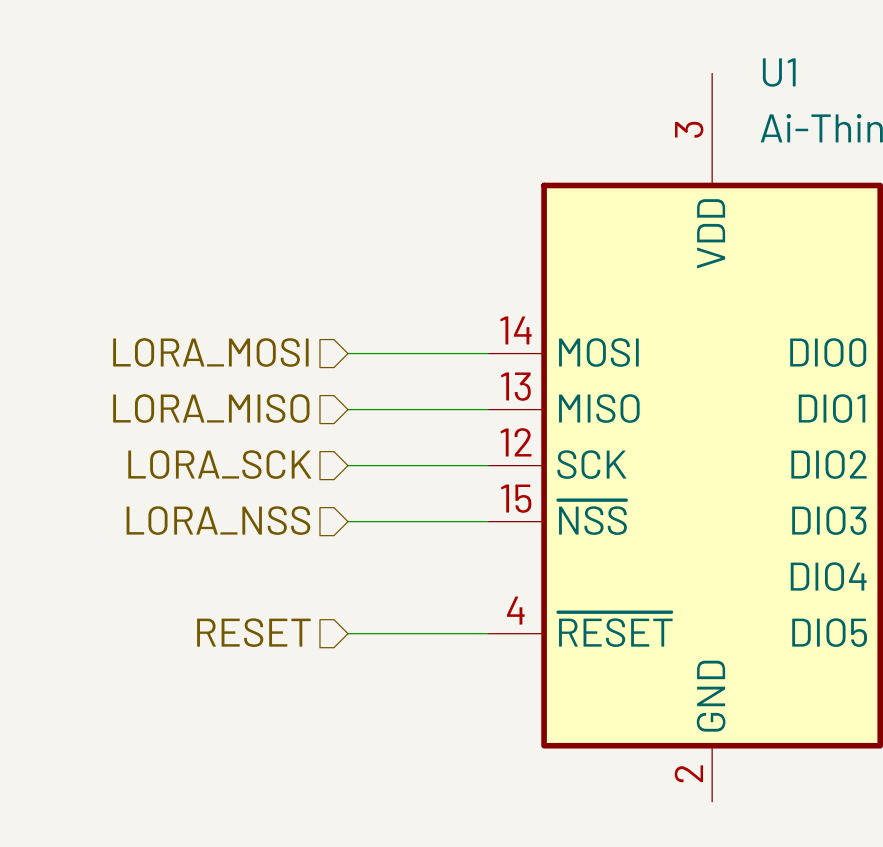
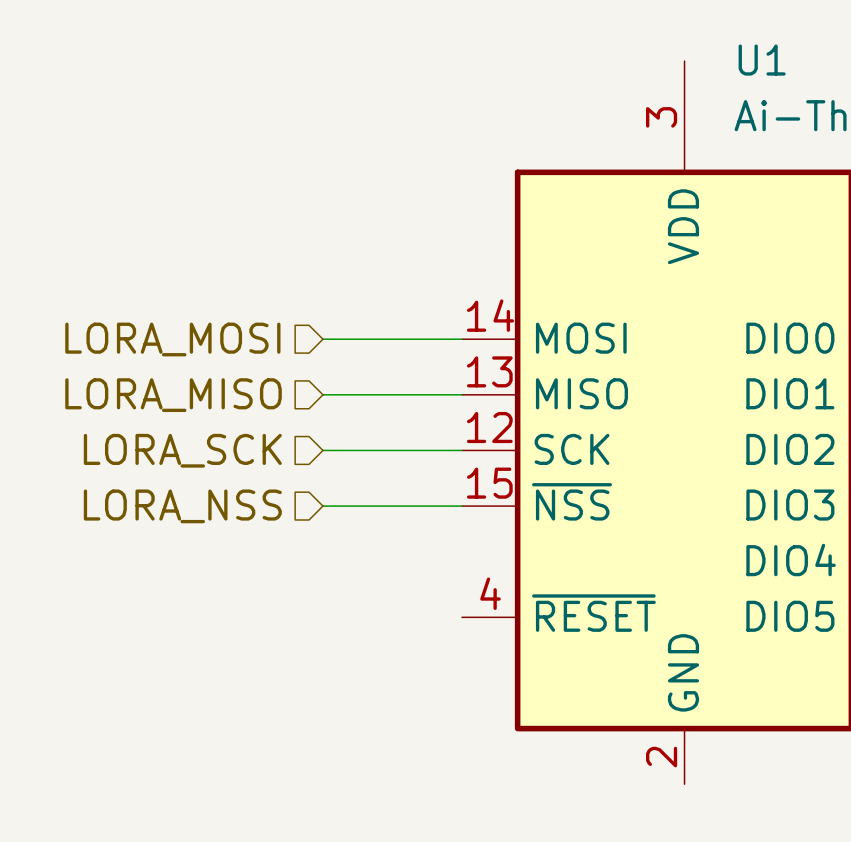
hierarchical label: RESET (253, 632) -> none
wire: (347, 633) (488, 633) -> none

